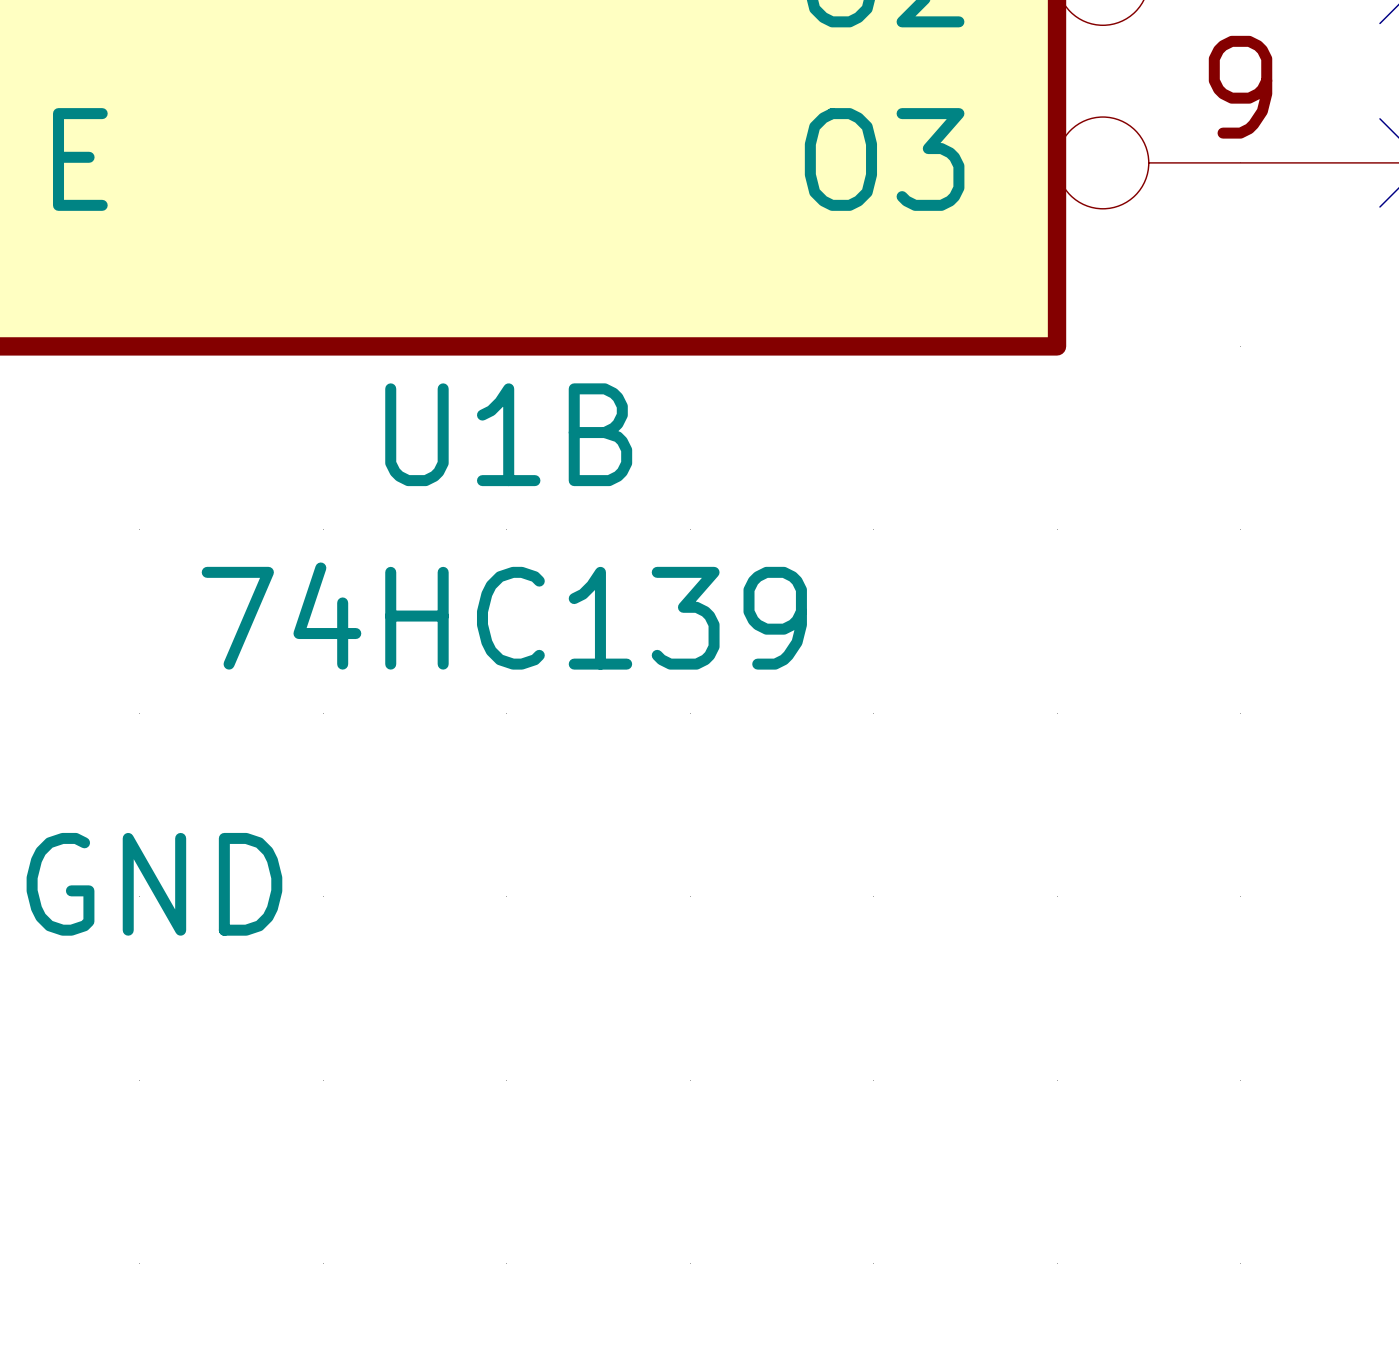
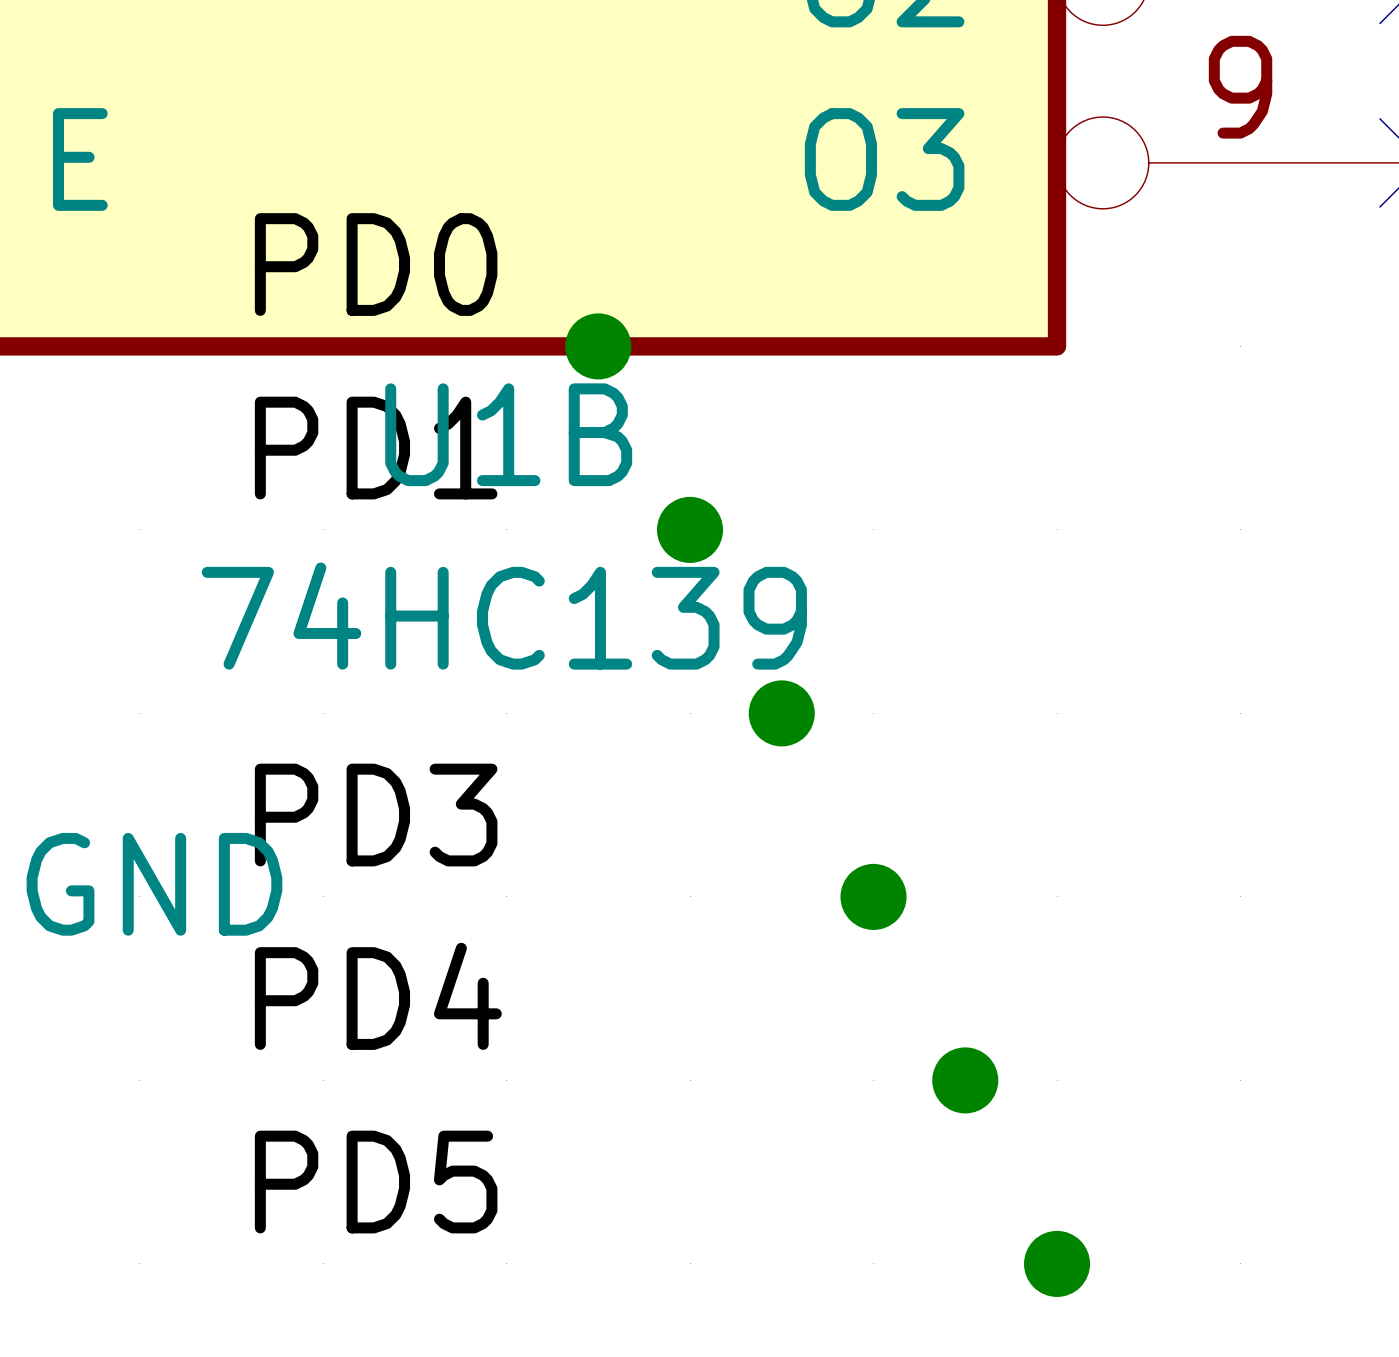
label: none -> PD0 (376, 264)
junction: none -> (598, 346)
label: none -> PD1 (376, 448)
junction: none -> (690, 529)
junction: none -> (781, 713)
label: none -> PD3 (376, 815)
junction: none -> (873, 896)
label: none -> PD4 (378, 996)
junction: none -> (965, 1080)
label: none -> PD5 (376, 1182)
junction: none -> (1057, 1263)

